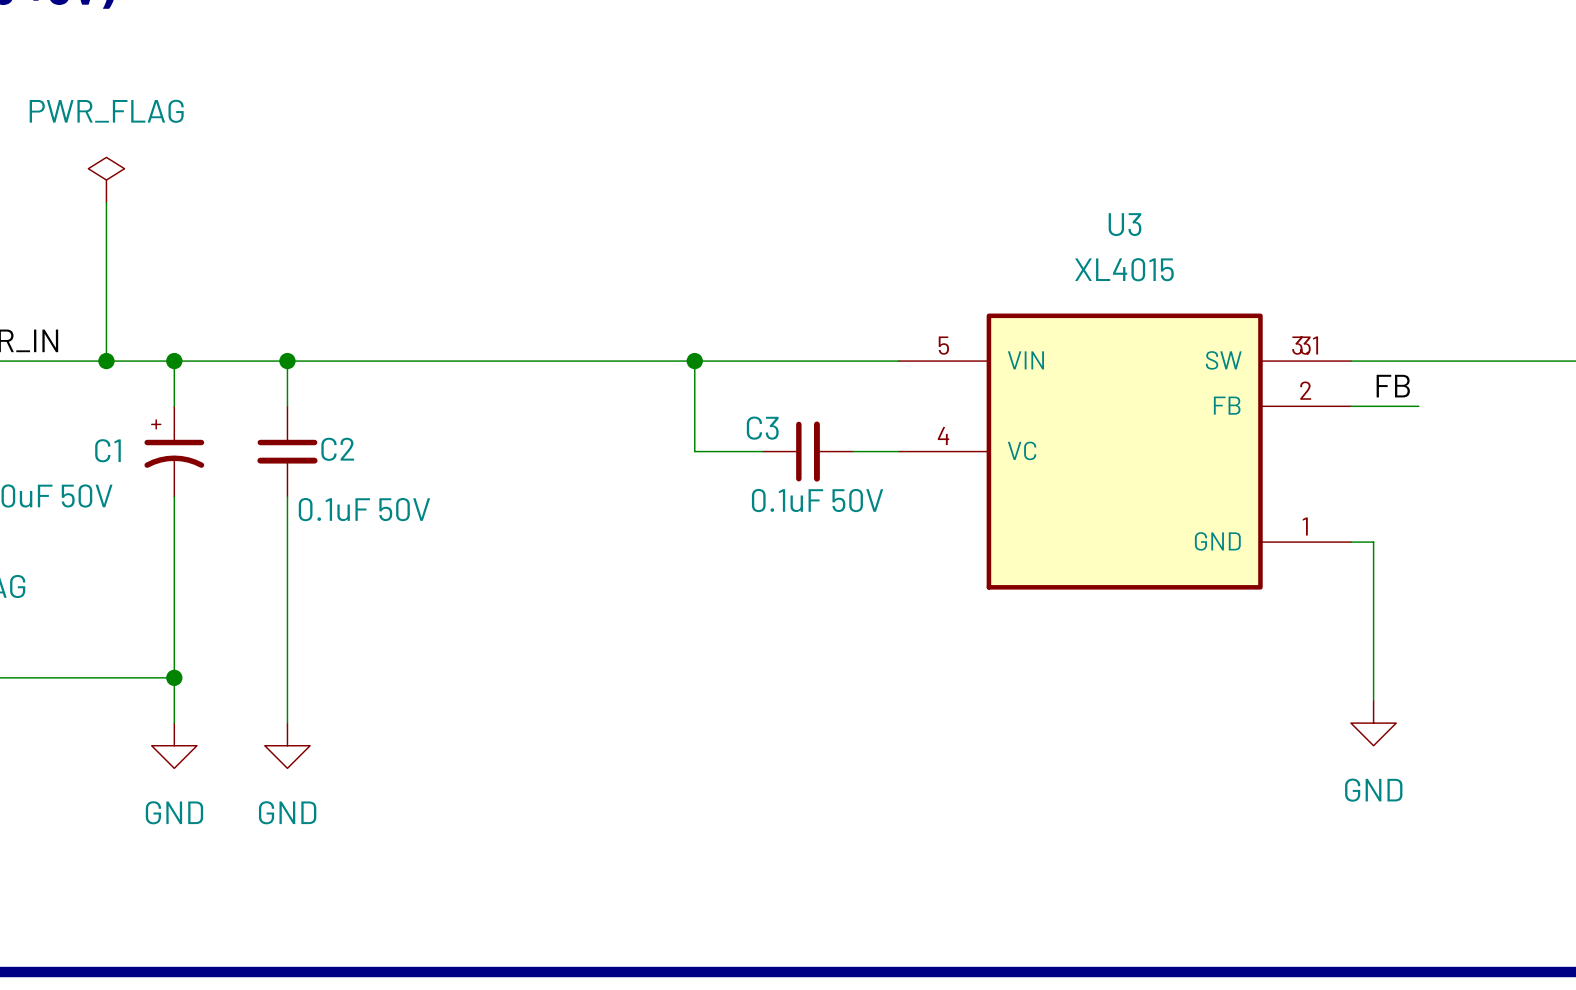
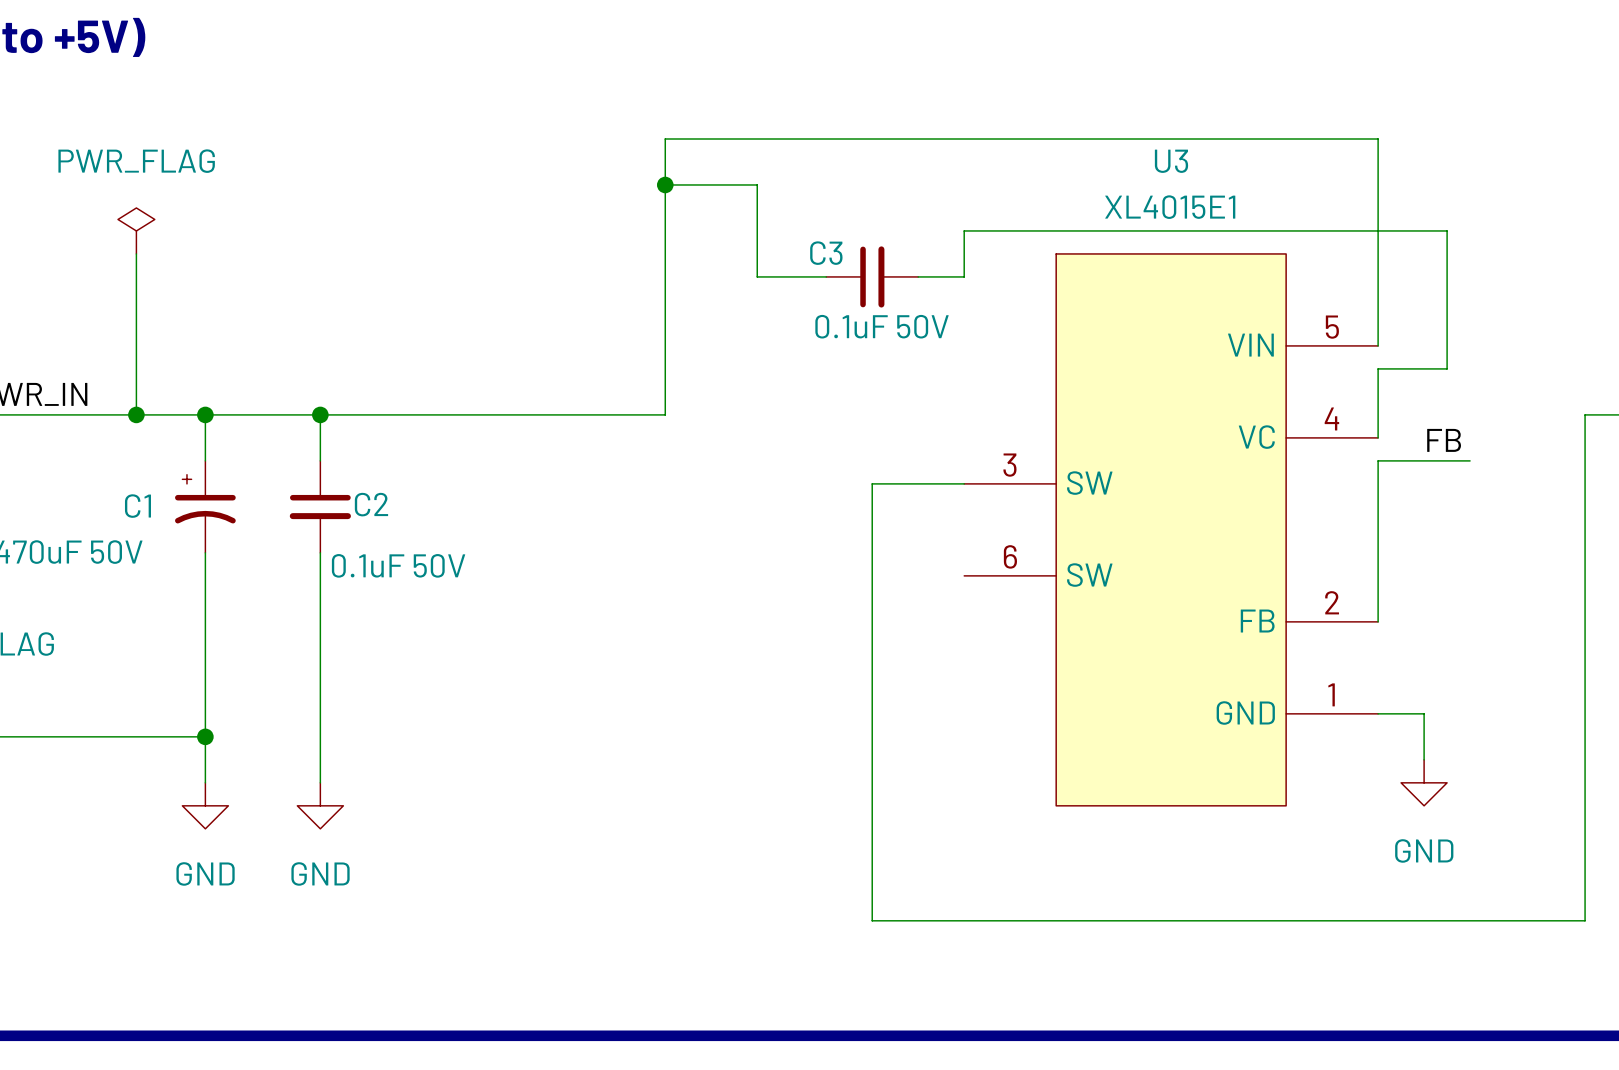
wire: none -> (665, 184) (757, 184) (757, 276) (826, 276)
junction: none -> (665, 184)
U3 name position: U3 (1125, 224) -> U3 (1171, 161)
wire: none -> (918, 276) (964, 276) (964, 230) (1447, 230) (1447, 368) (1378, 368) (1378, 437)
U3 value: XL4015 (1124, 269) -> XL4015E1 (1170, 207)
U3 symbol: [898, 313, 1351, 590] -> [964, 253, 1379, 806]
wire: (626, 361) (898, 361) -> (665, 414) (665, 138) (1378, 138) (1378, 345)
wire: (694, 361) (694, 451) (762, 451) -> none
junction: (694, 361) -> none
wire: (1350, 361) (1531, 361) -> (964, 483) (872, 483) (872, 920) (1585, 920) (1585, 414)
wire: none -> (1401, 460) (1378, 460) (1378, 621)
C3 position: (807, 451) -> (872, 276)
wire: (853, 451) (898, 451) -> none
wire: (1350, 542) (1373, 542) (1373, 655) -> (1378, 713) (1424, 713)

